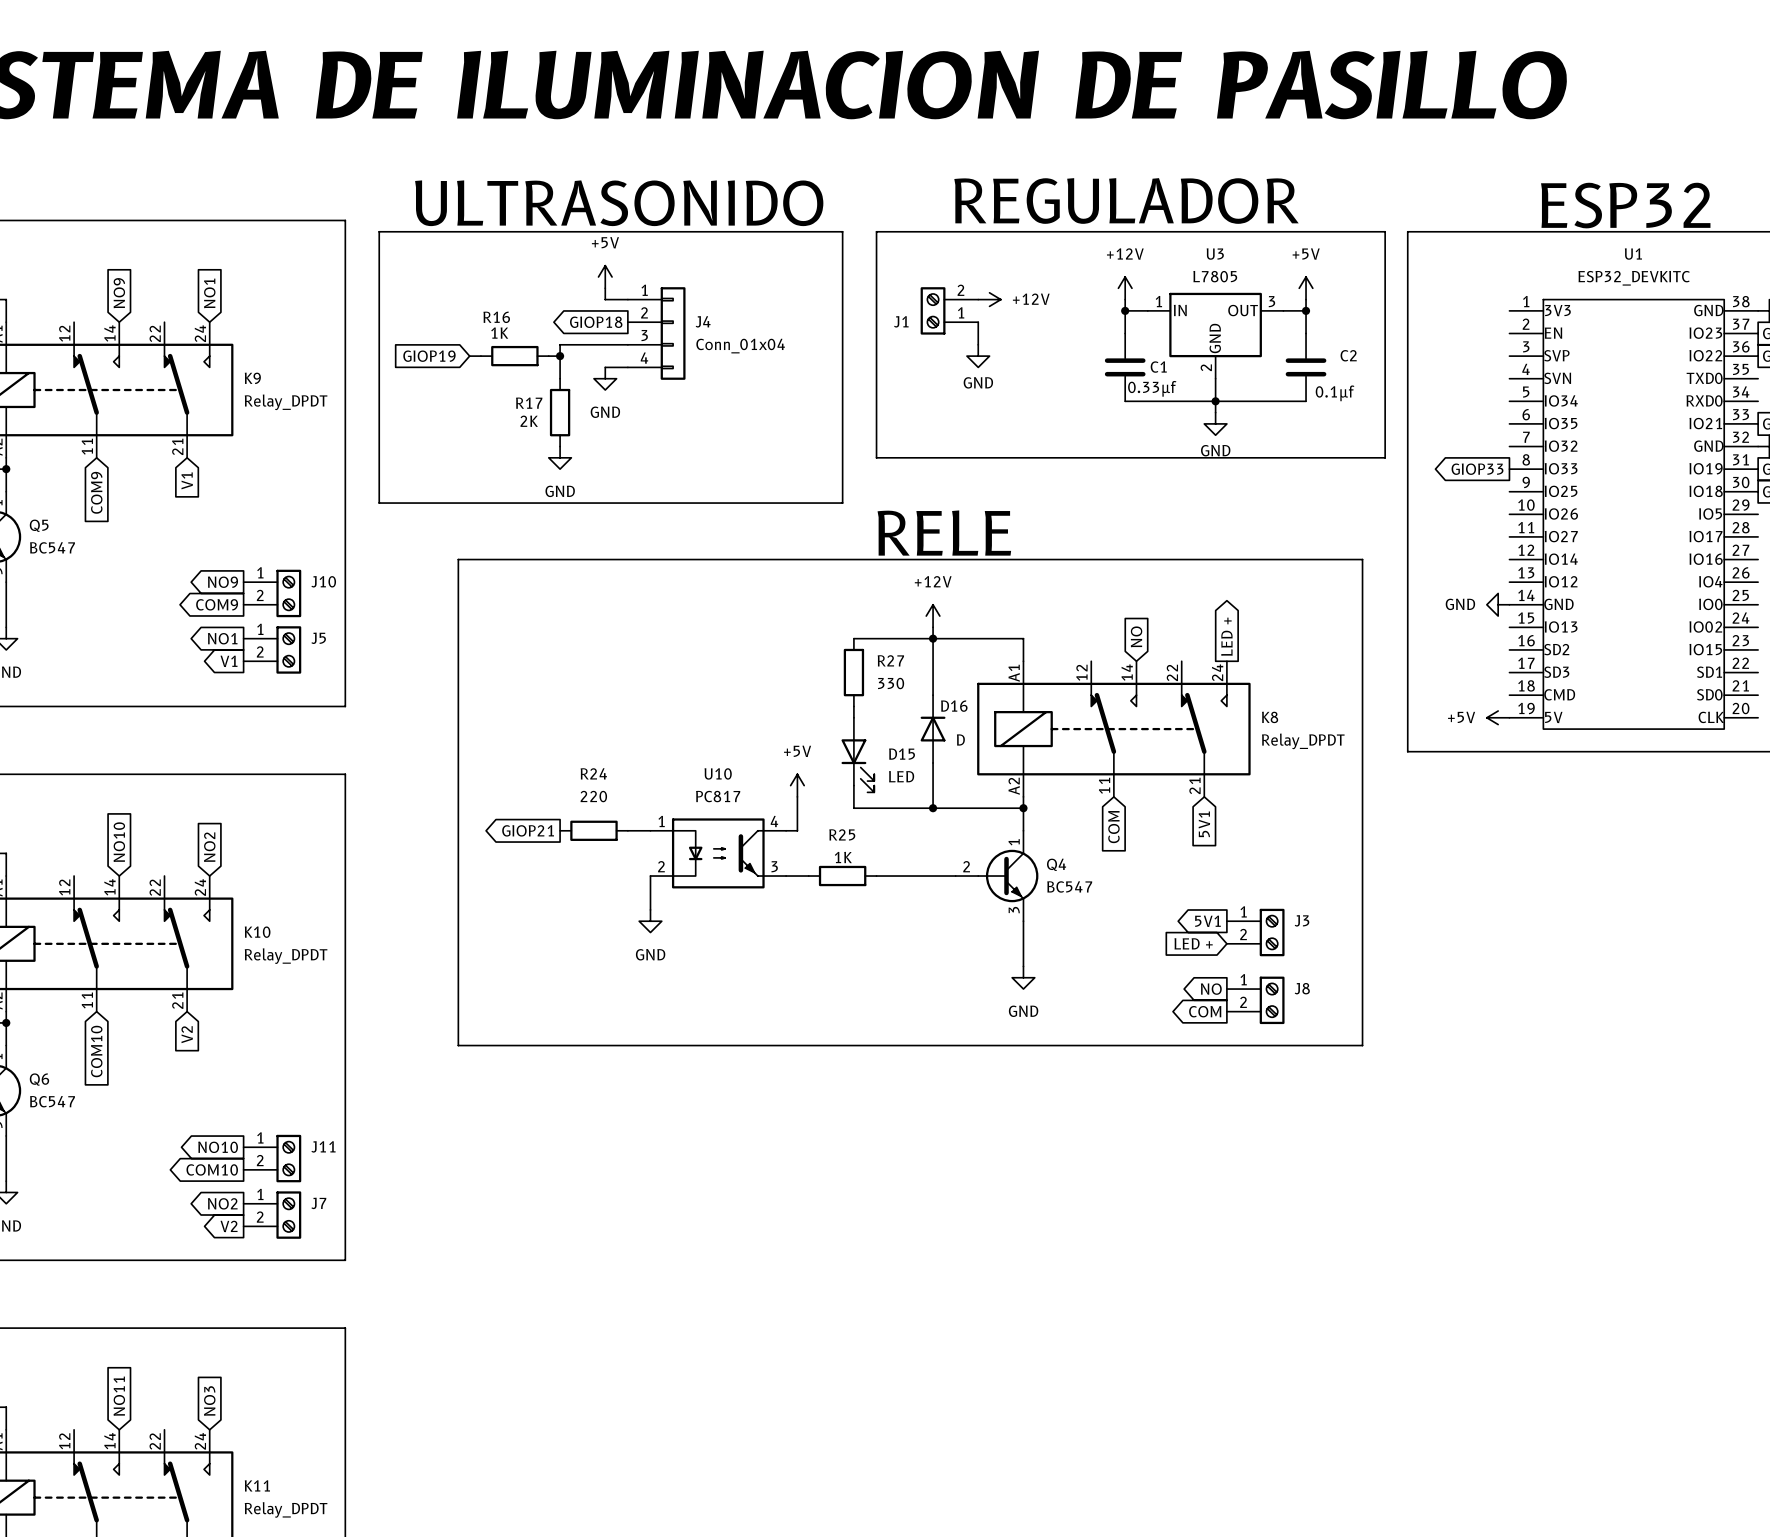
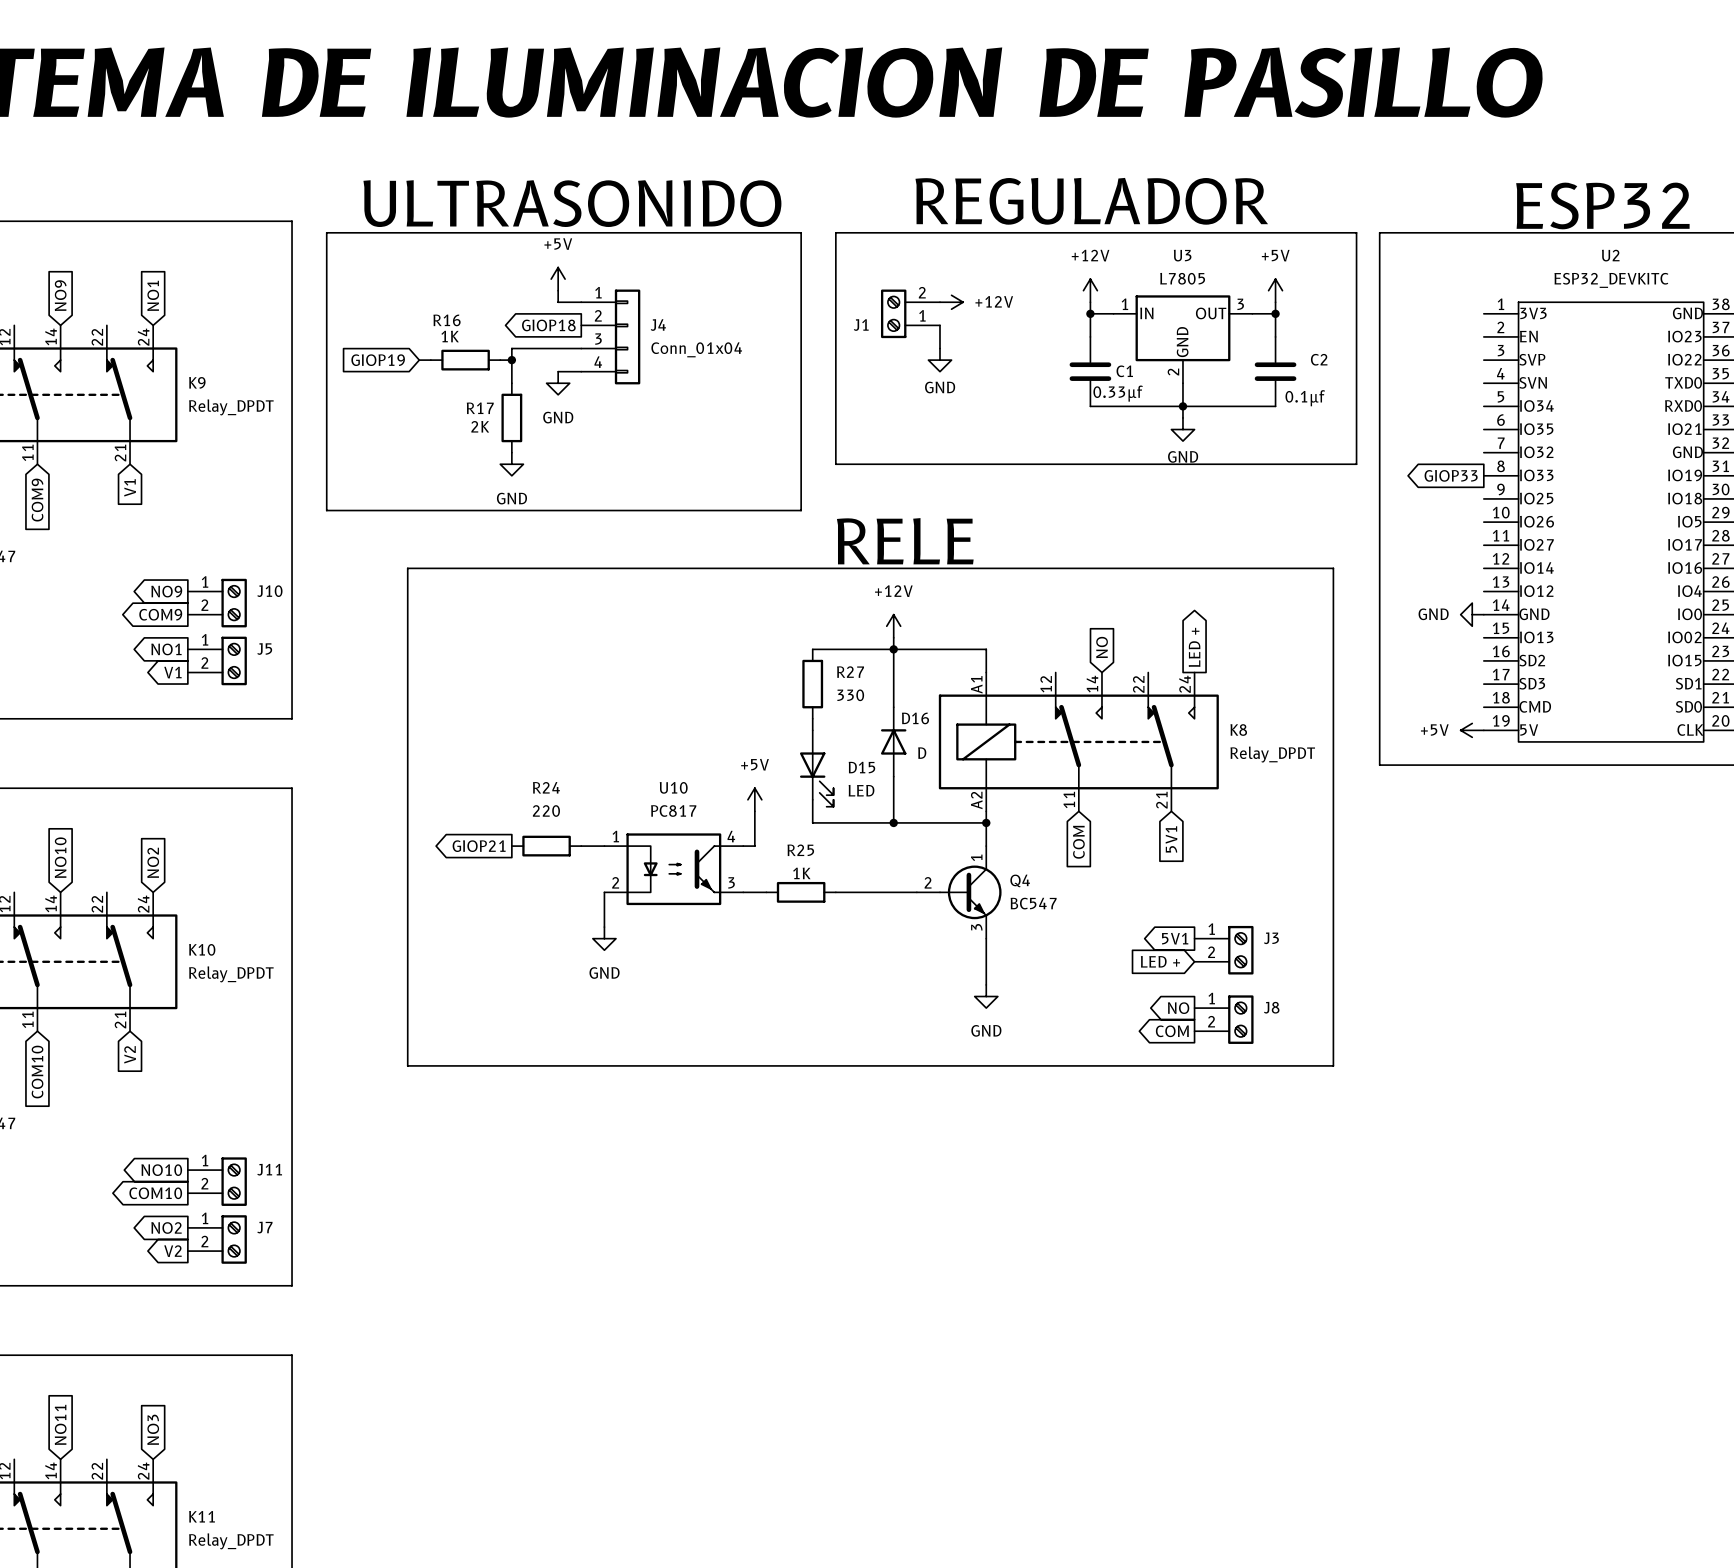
U1 name: U1 (1633, 254) -> U2 (1610, 255)

